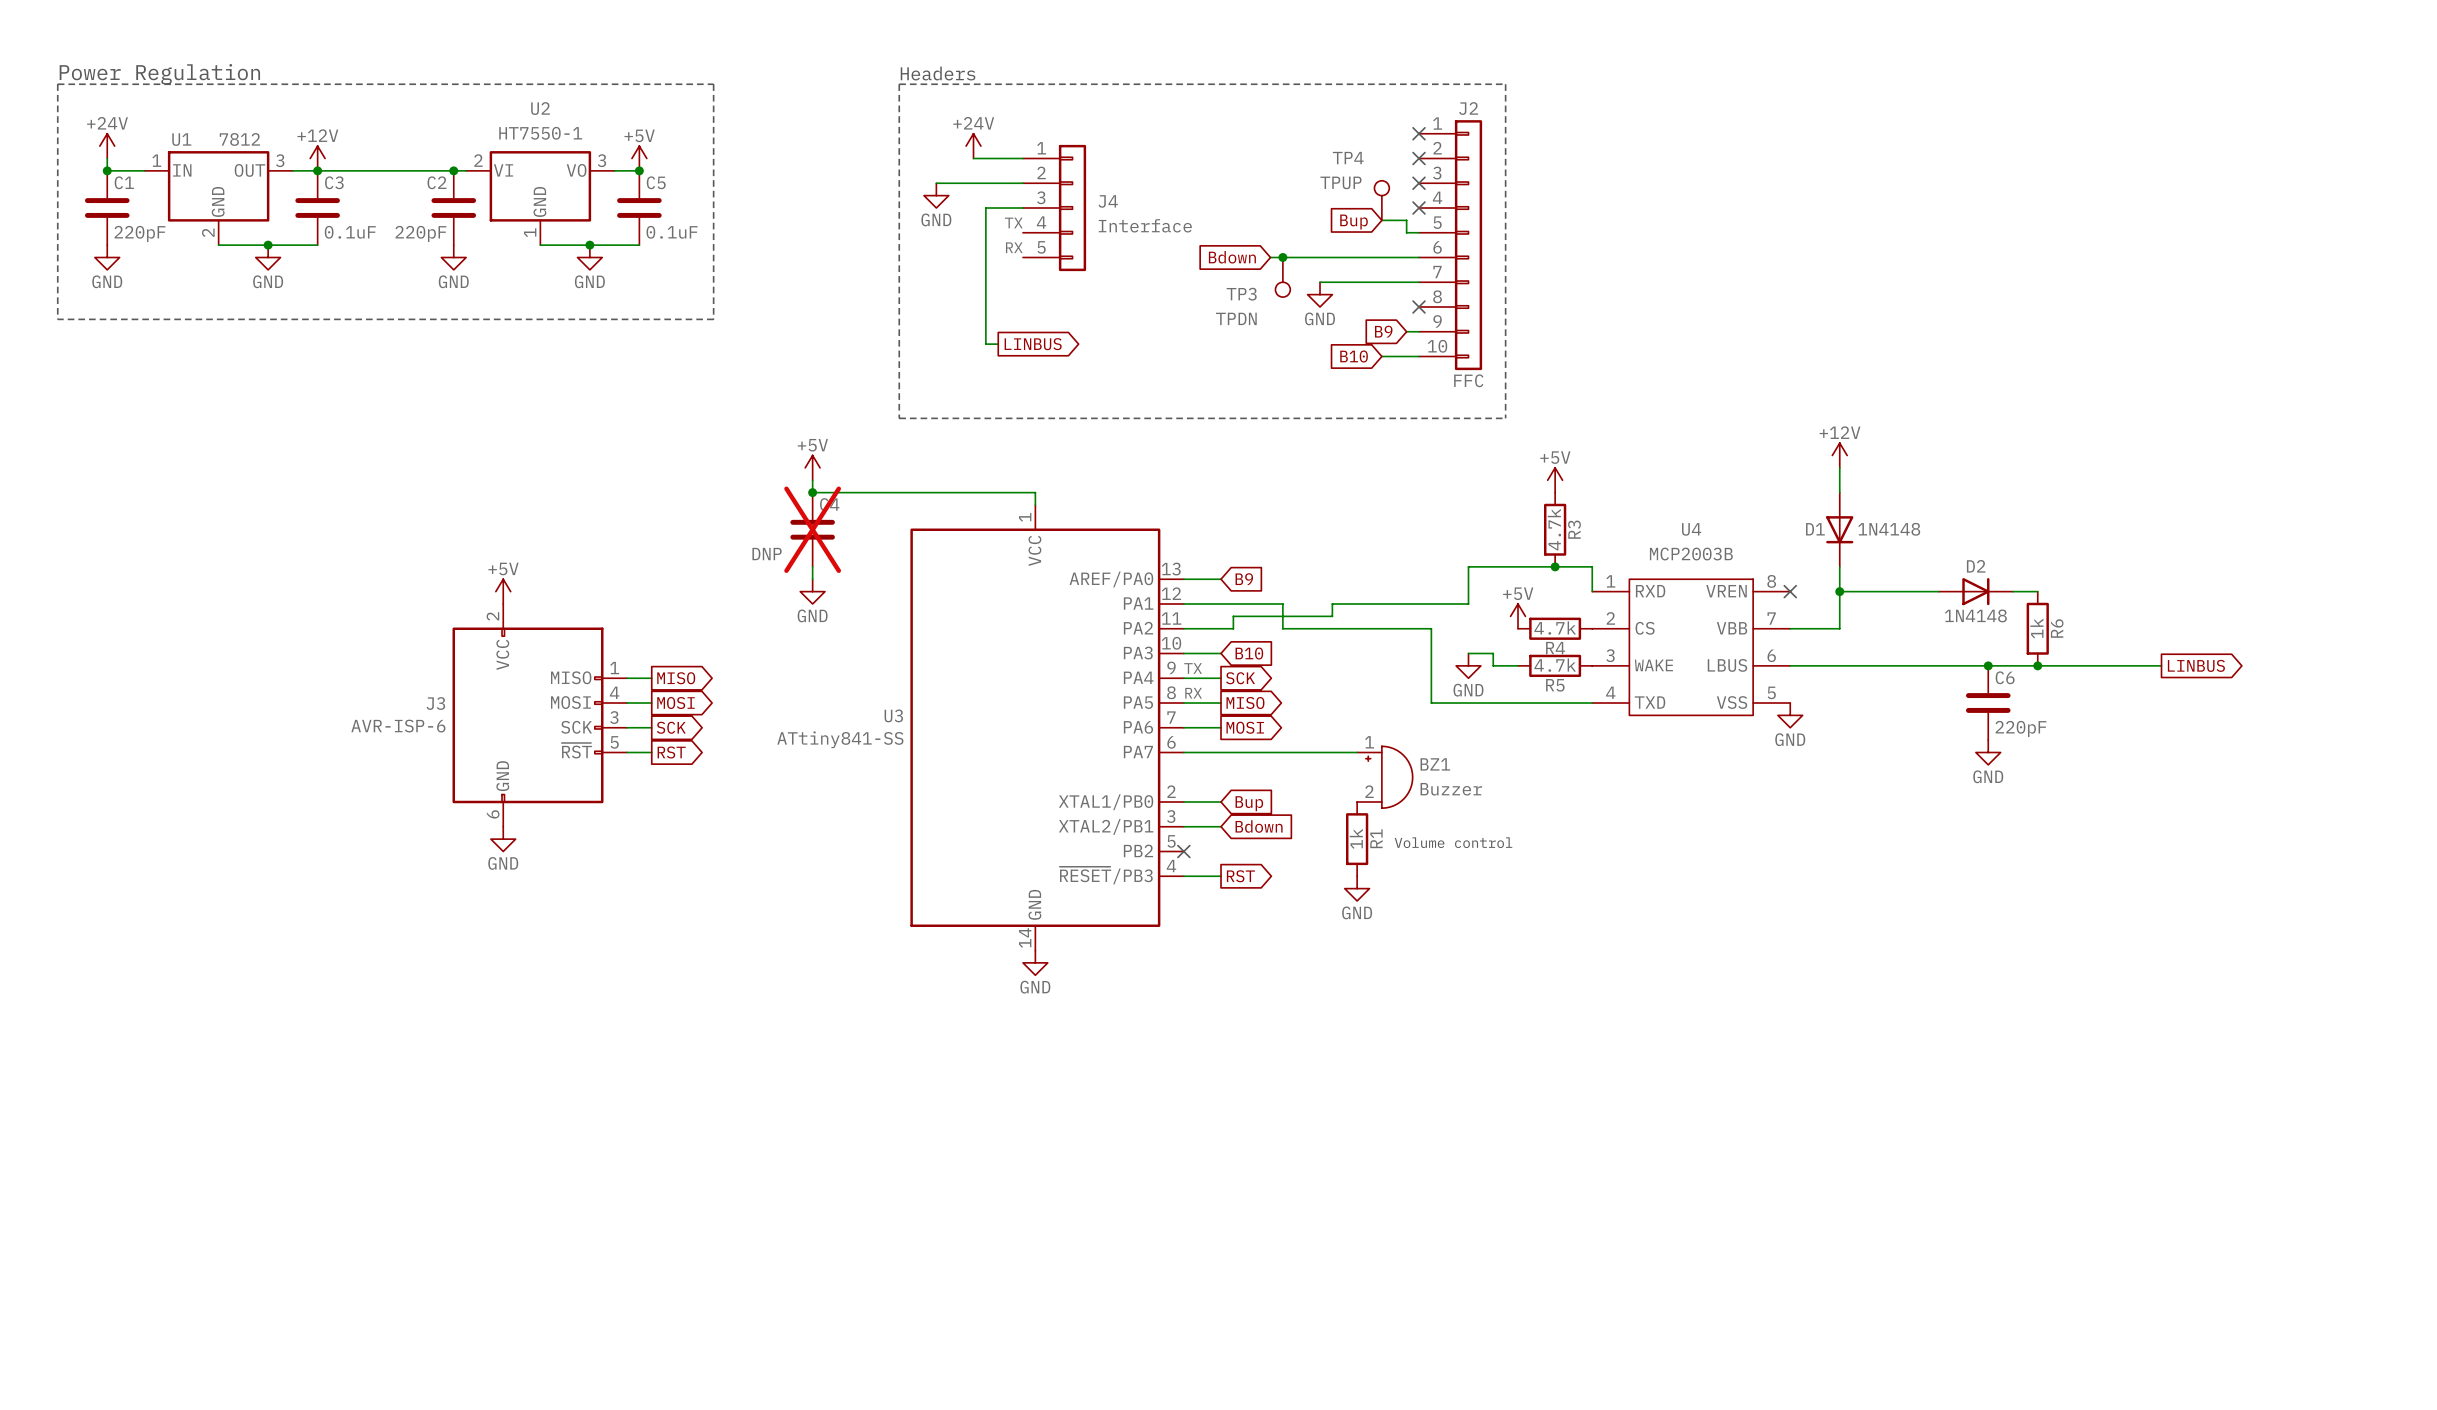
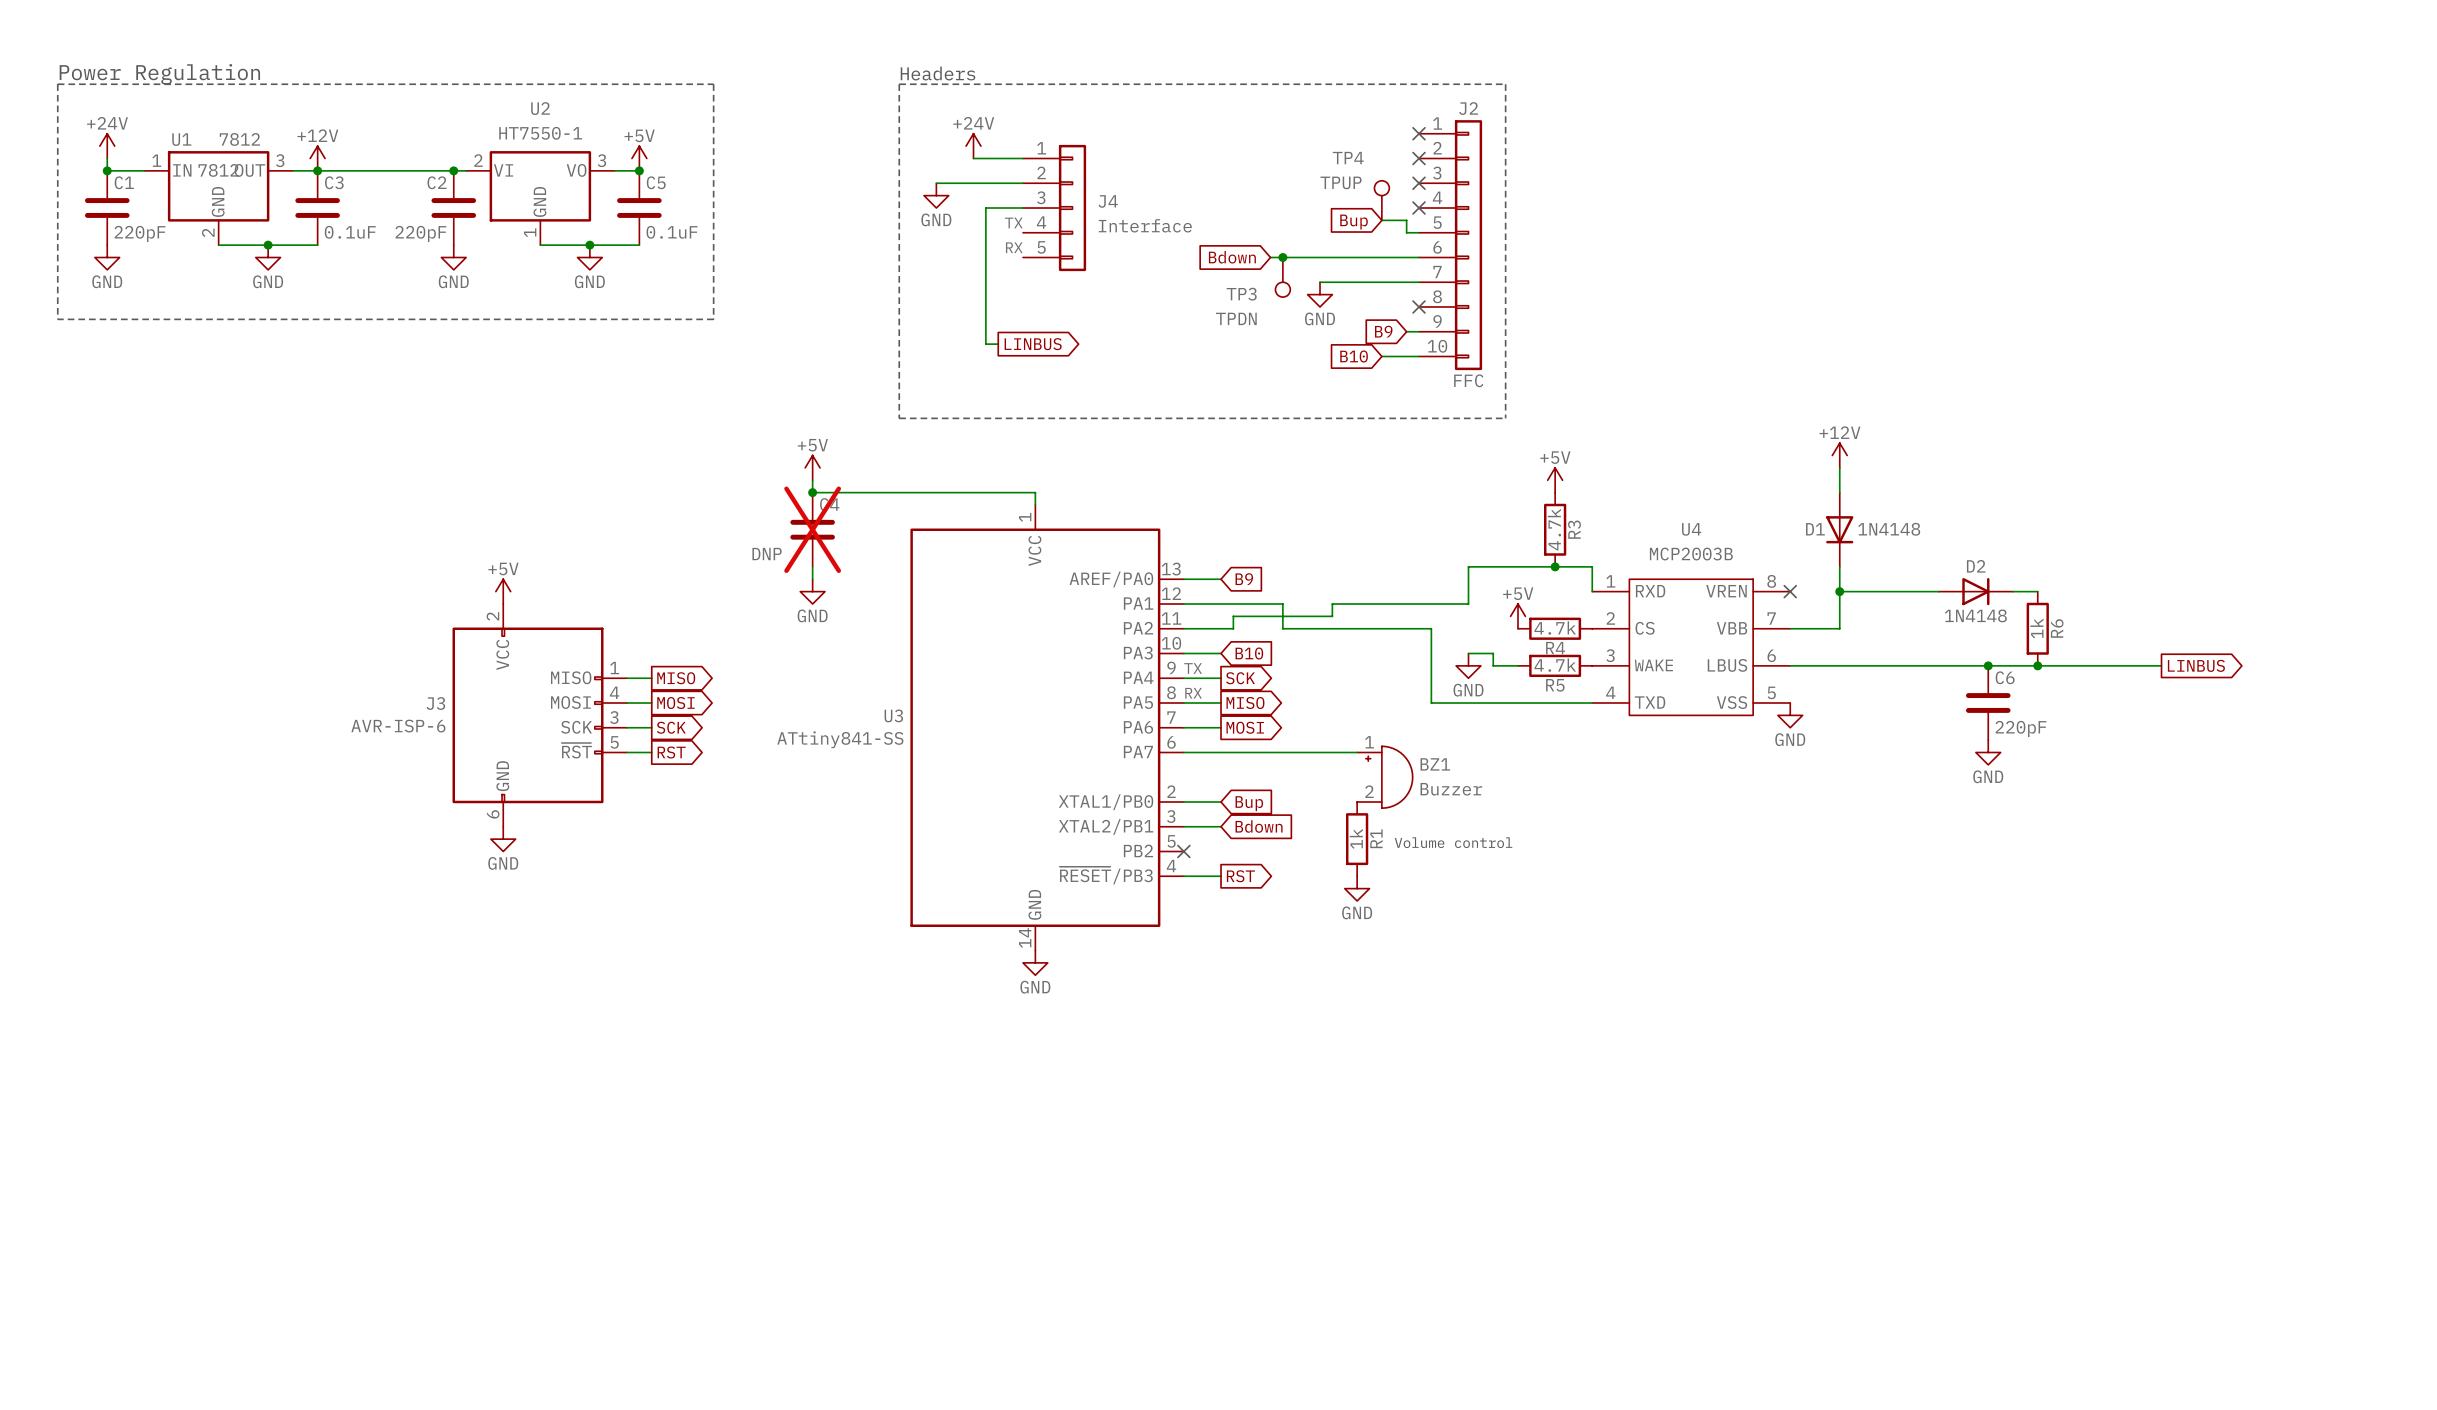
U1 text: none -> 7812 (218, 170)

